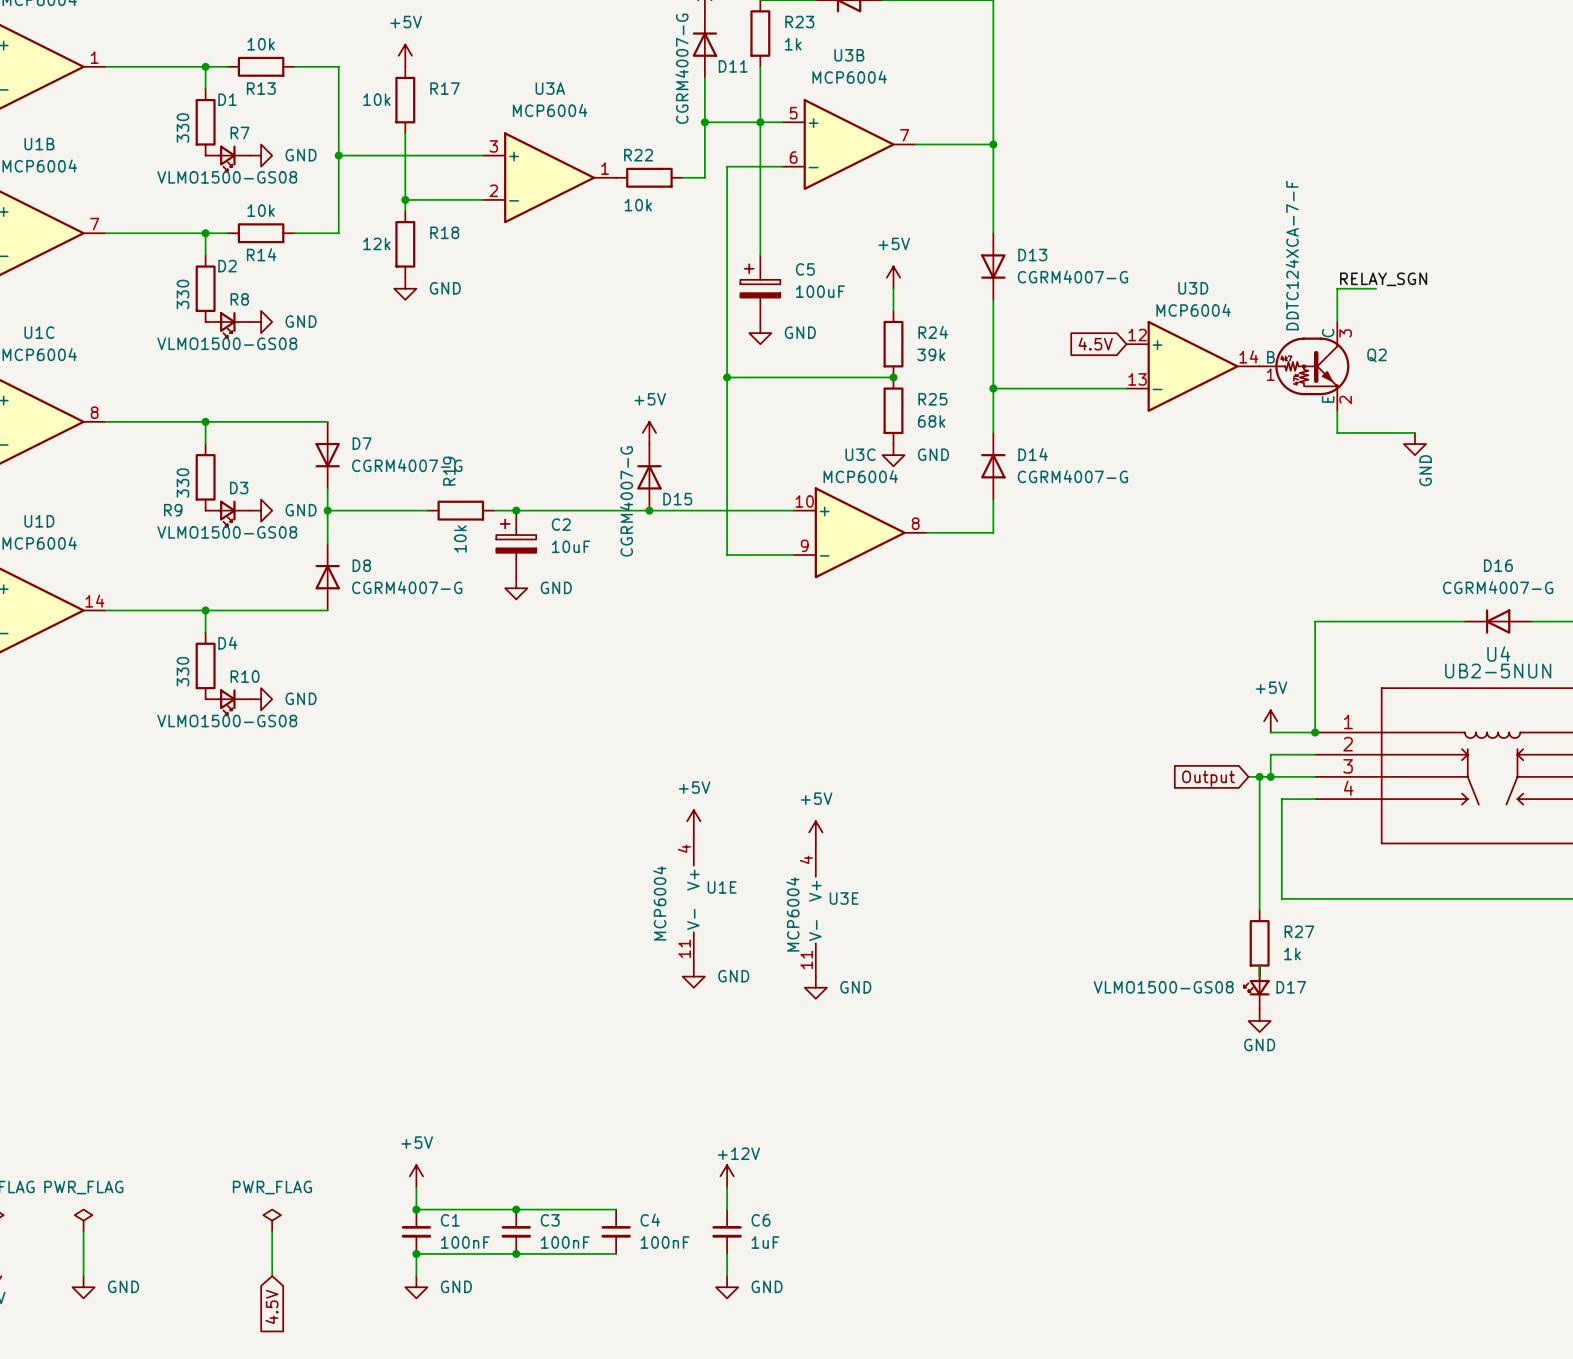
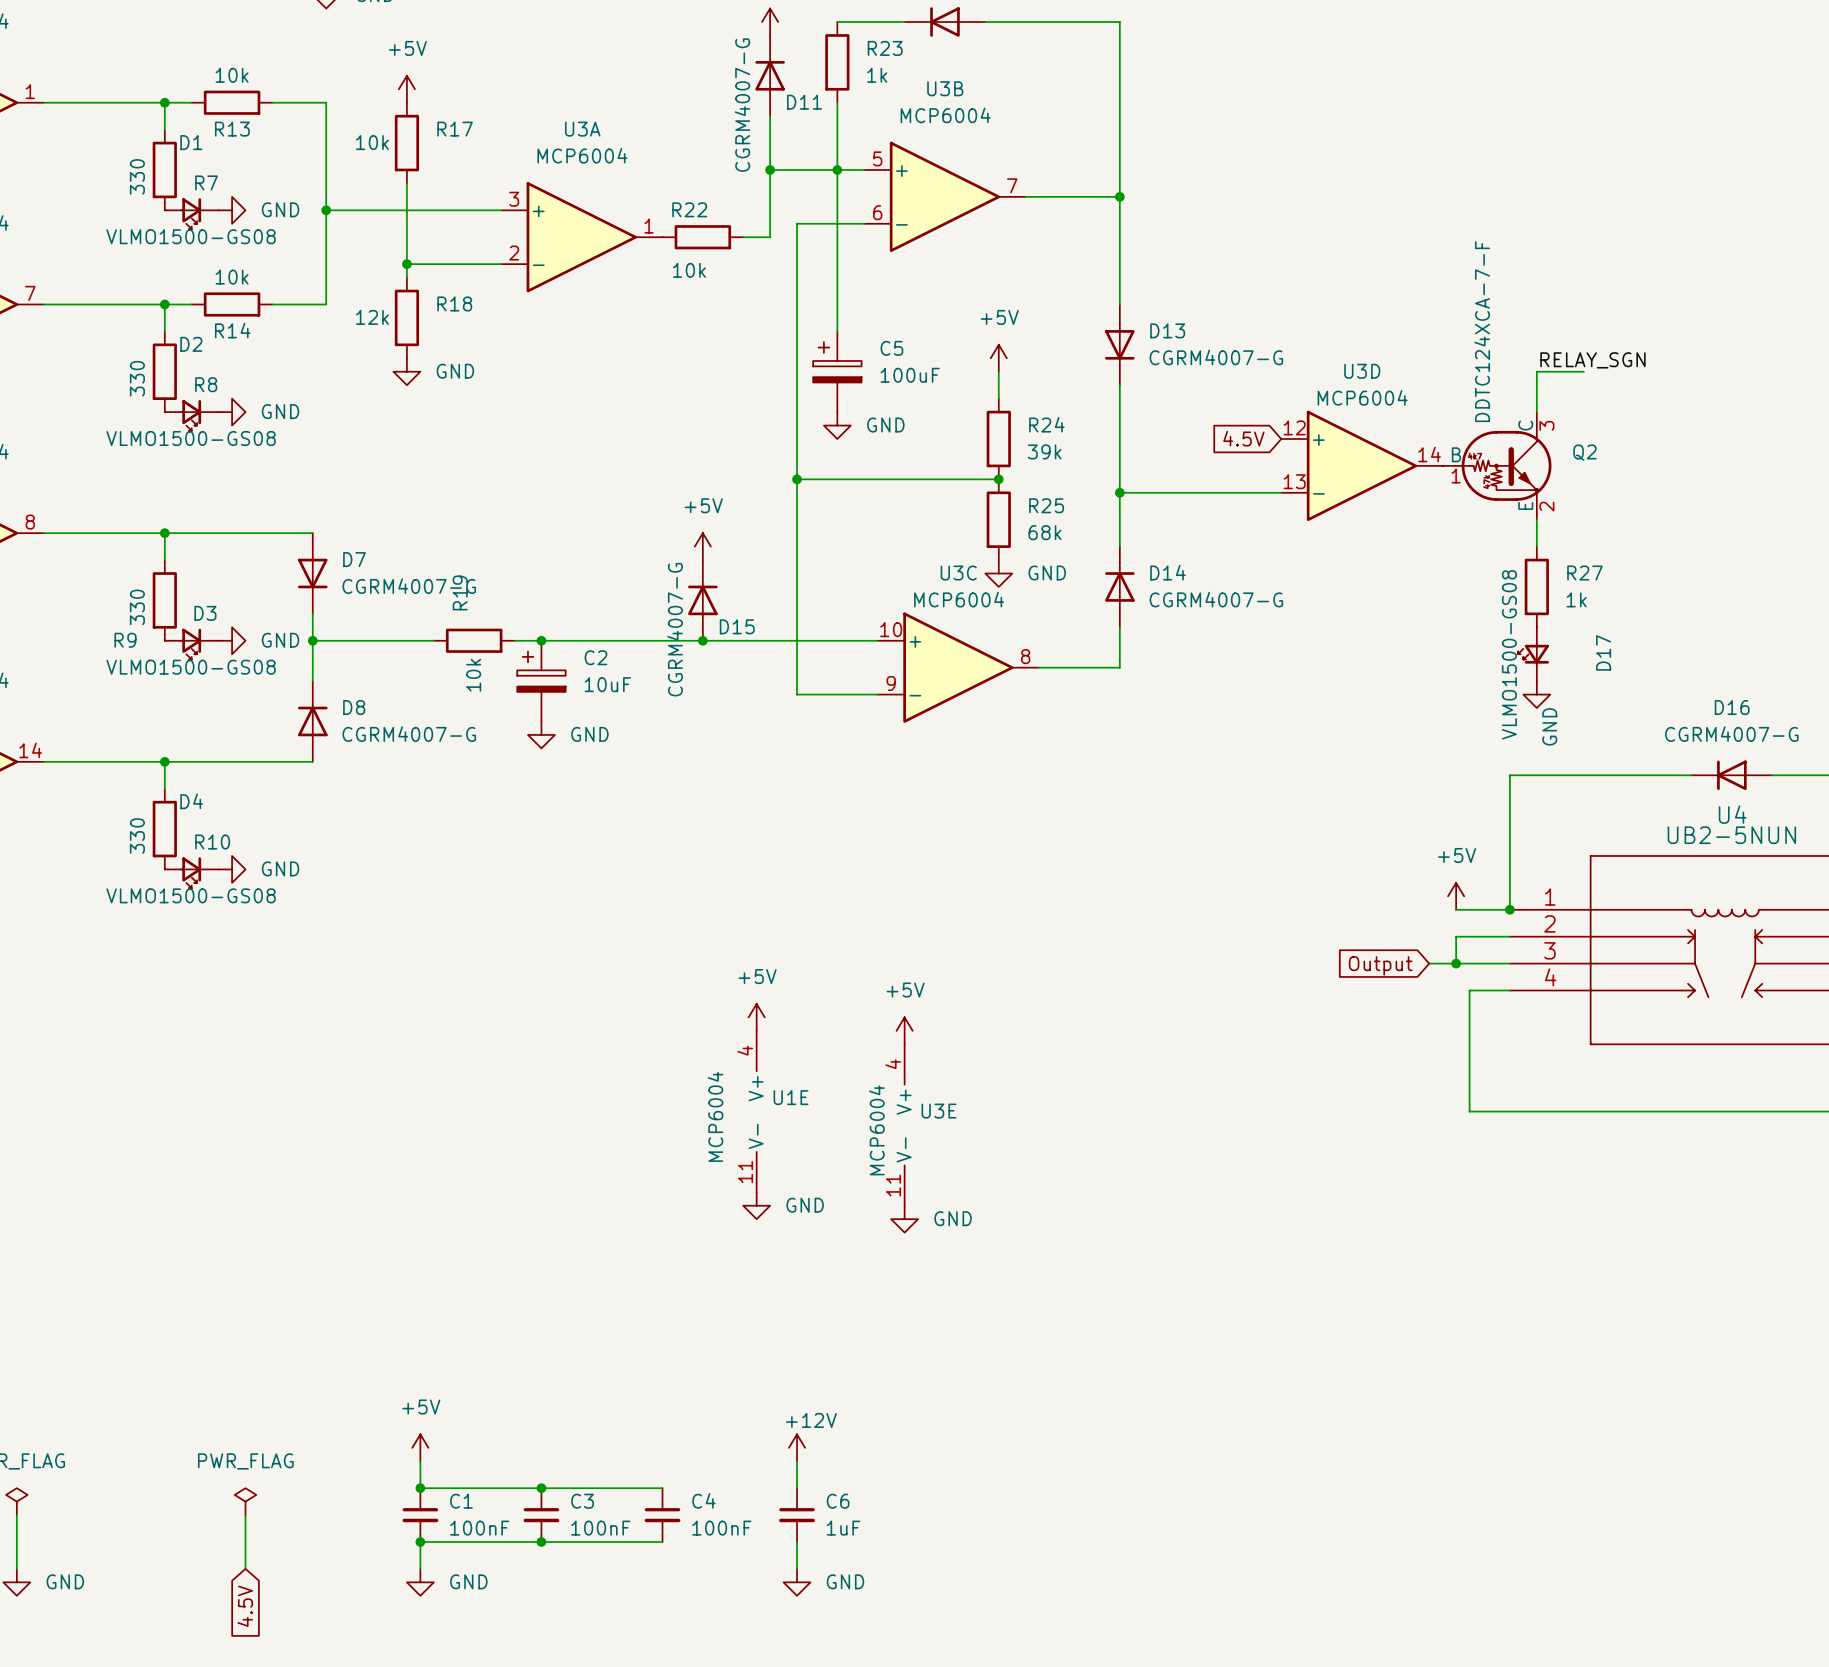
wire: (1337, 432) (1414, 432) -> none
power symbol position: GND (1414, 444) -> GND (1536, 694)
wire: (1259, 776) (1259, 910) -> none
junction: (1259, 776) -> none
R27 position: (1259, 943) -> (1536, 586)
wire: (1259, 965) (1259, 976) -> none
D17 value rotation: 0° (1163, 987) -> 90° counterclockwise (1509, 654)
D17 position: (1256, 987) -> (1533, 654)
D17 name rotation: 0° (1291, 987) -> 90° counterclockwise (1603, 652)
power symbol: GND (1259, 1020) -> none

